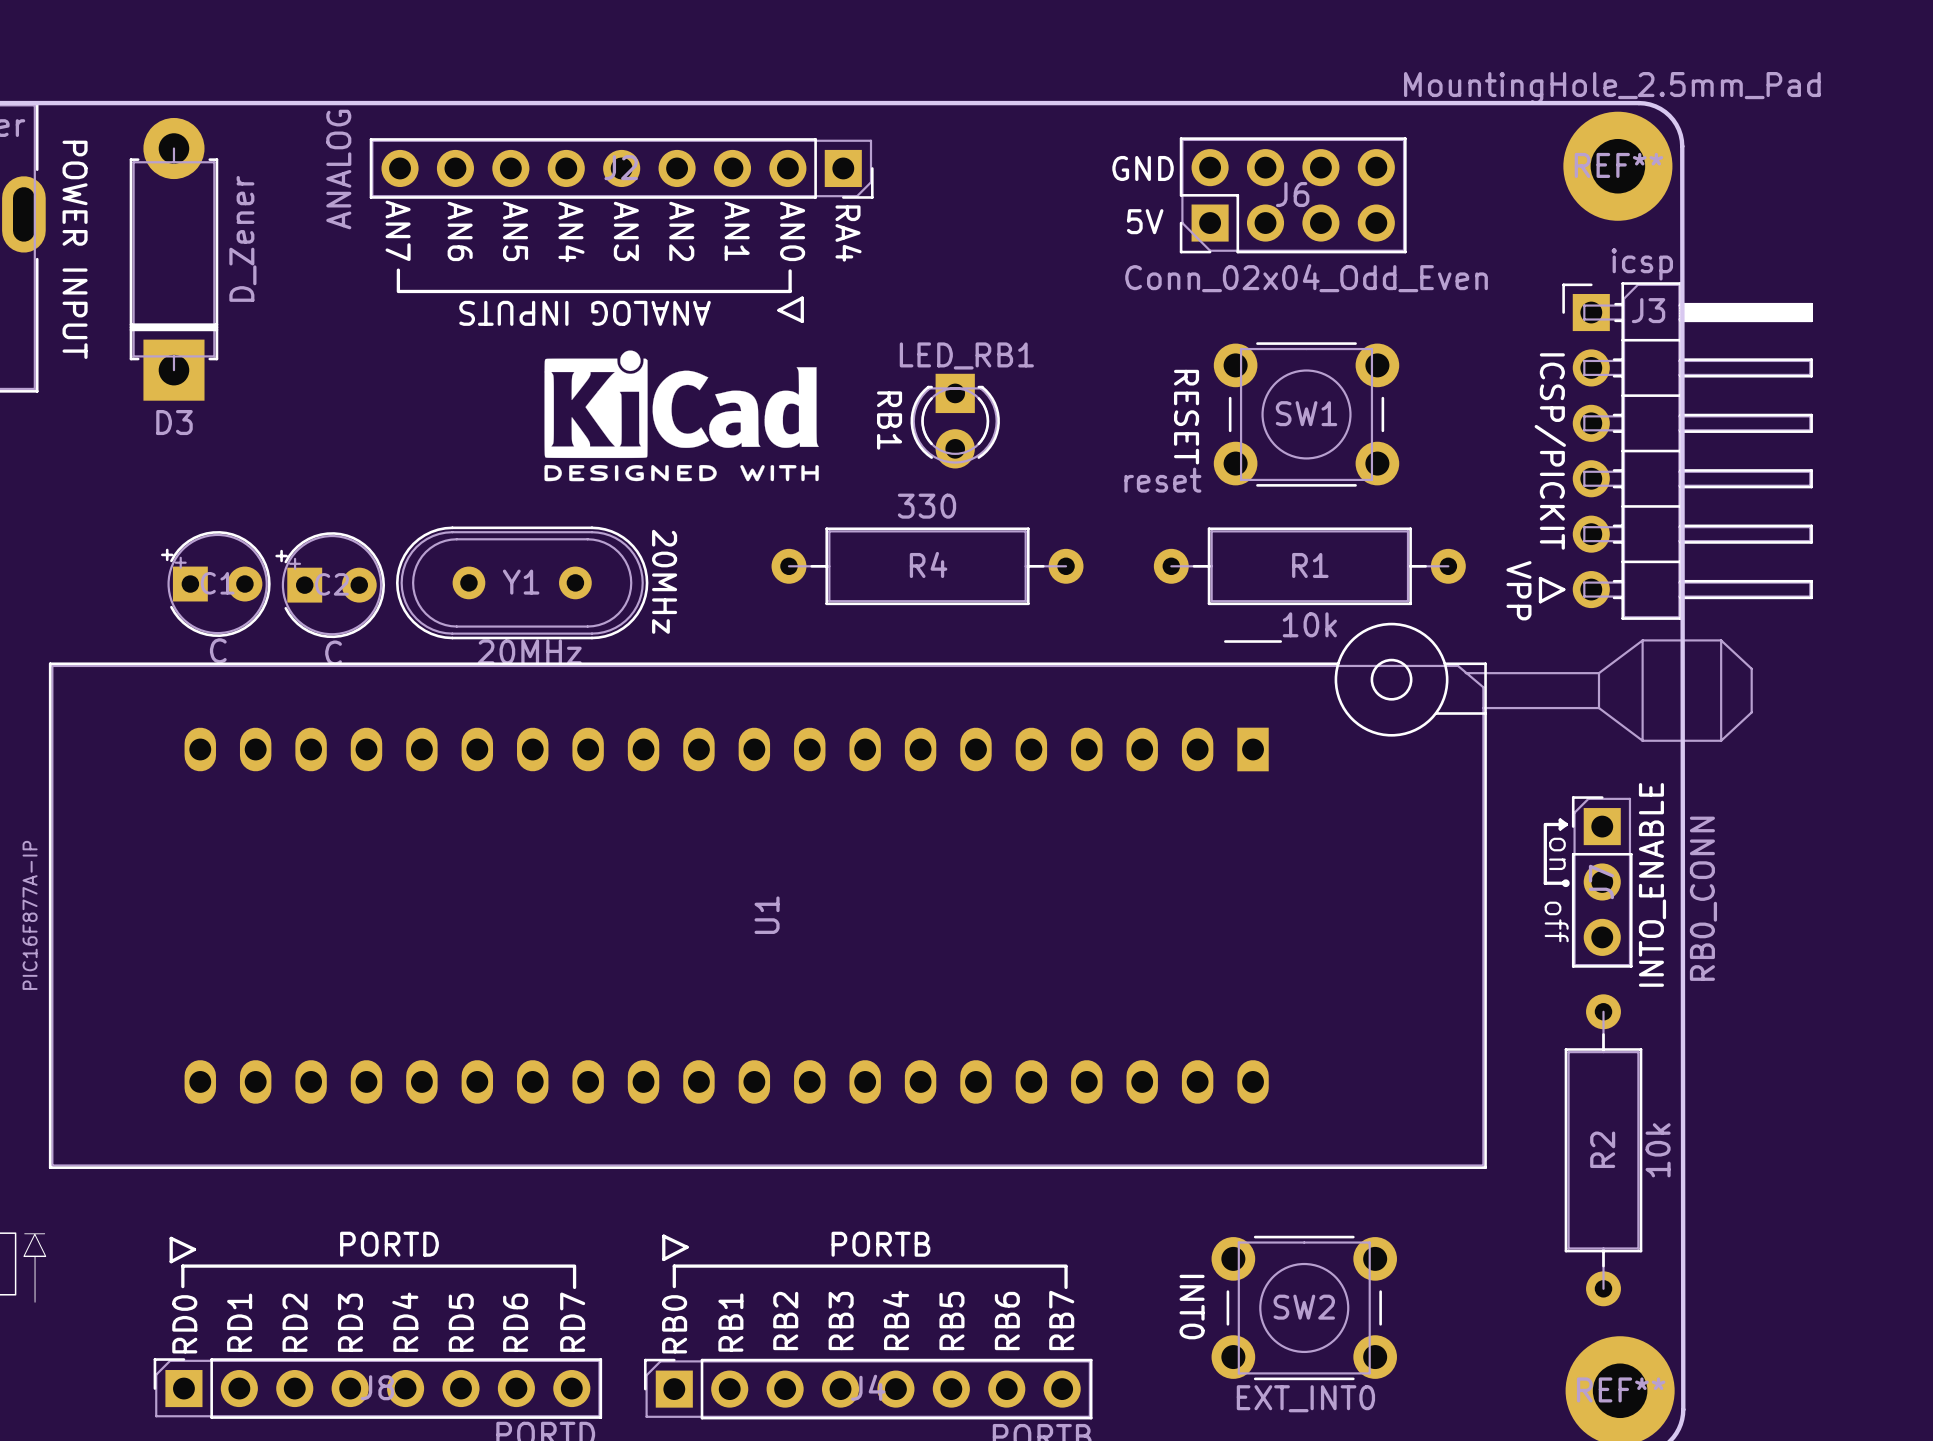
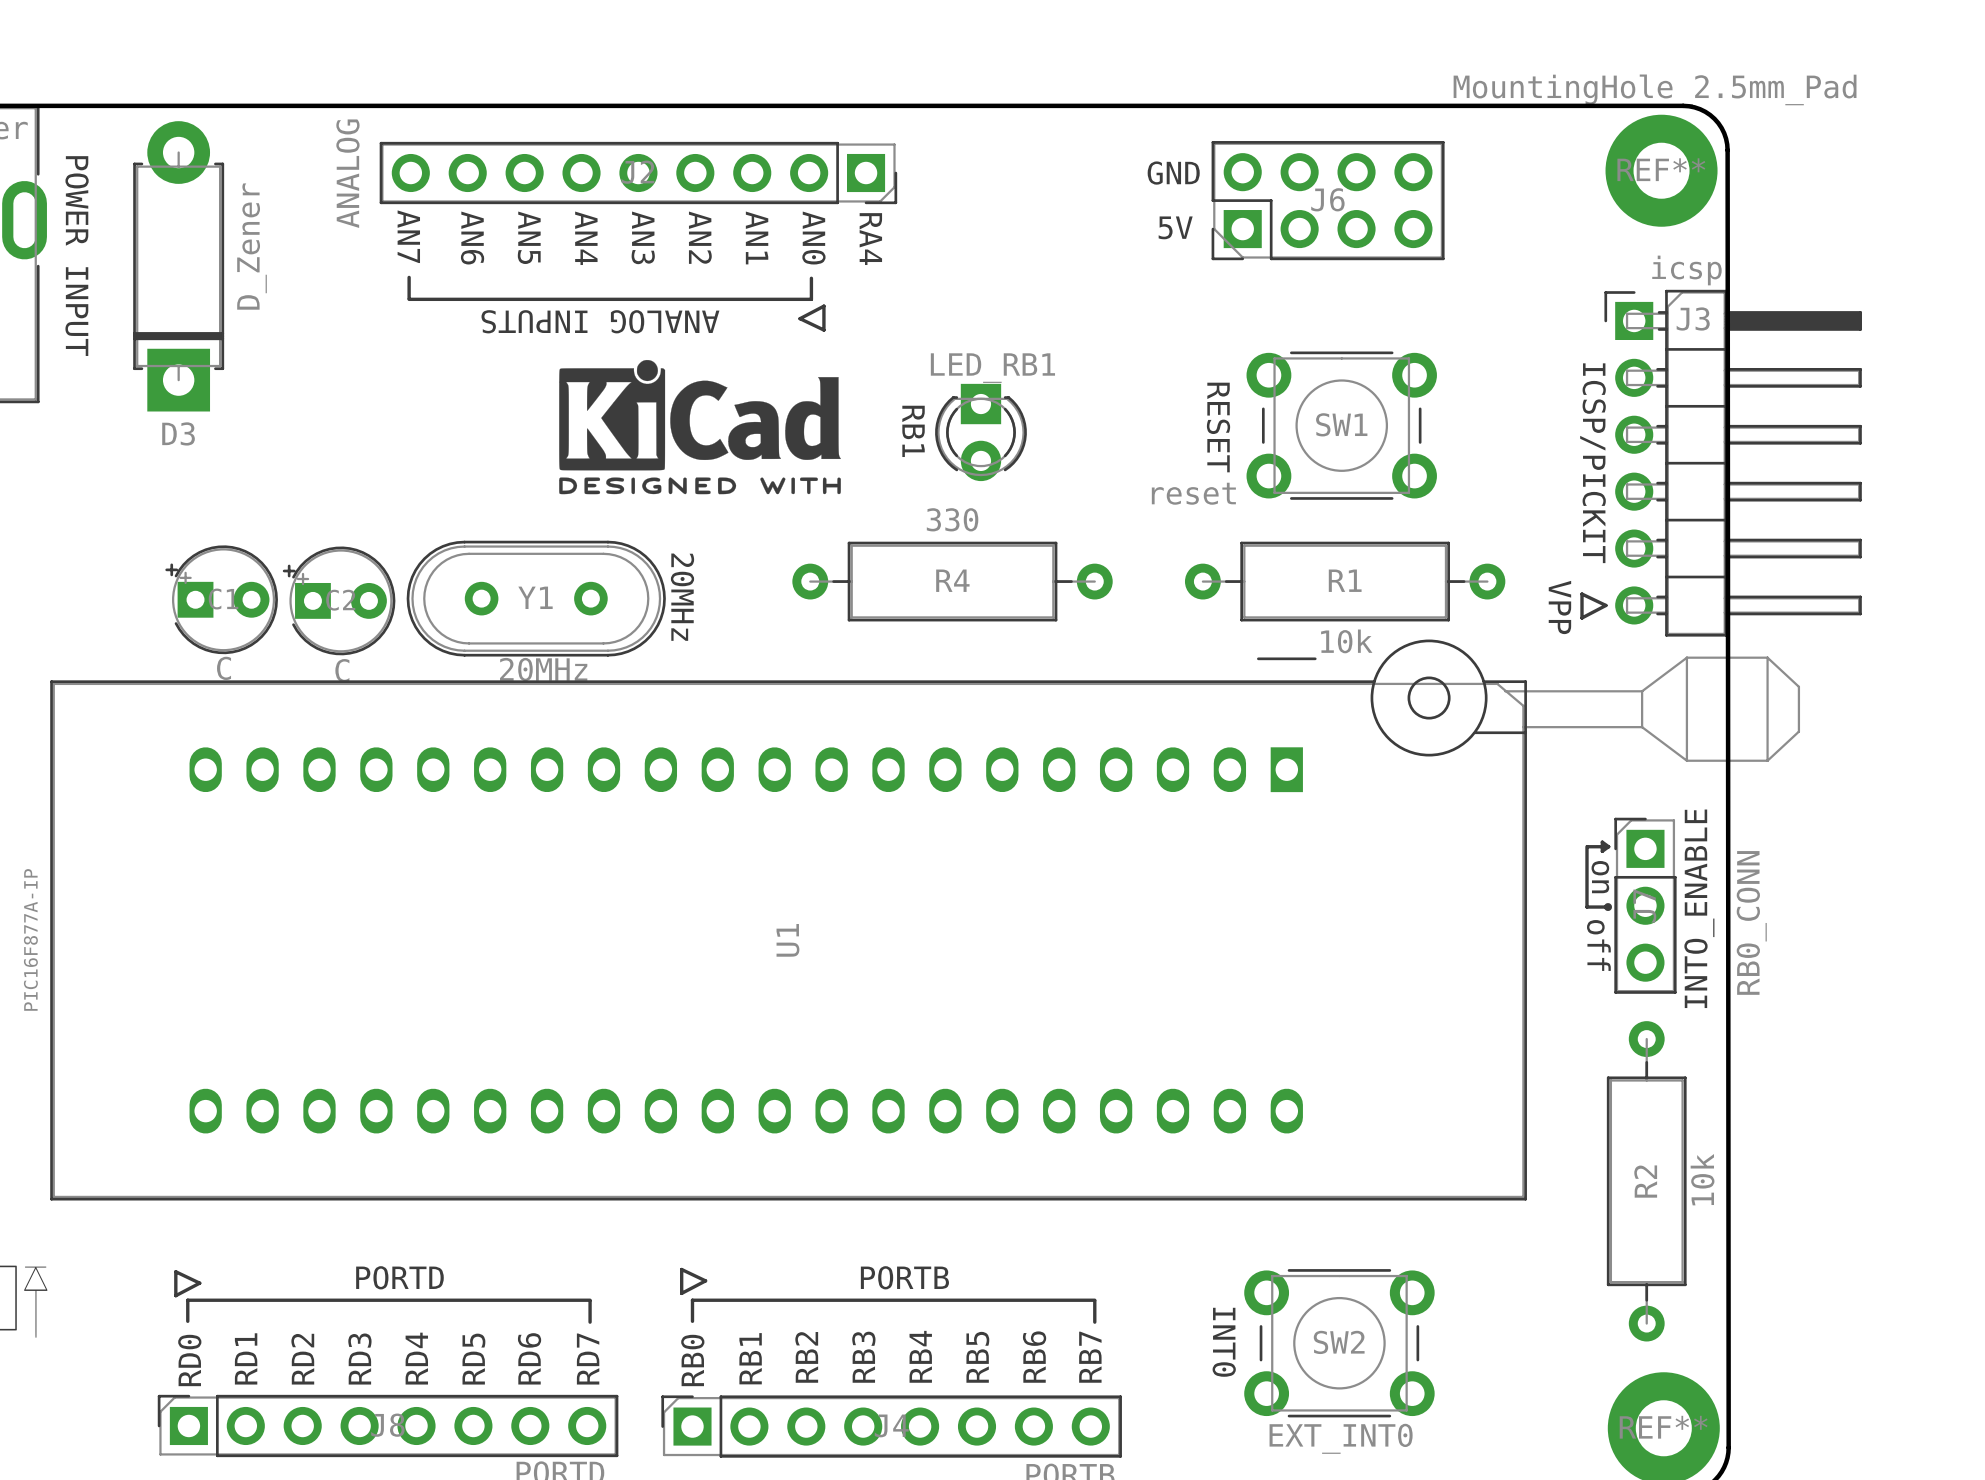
J6 value: Conn_02x04_Odd_Even (1306, 278) -> none

